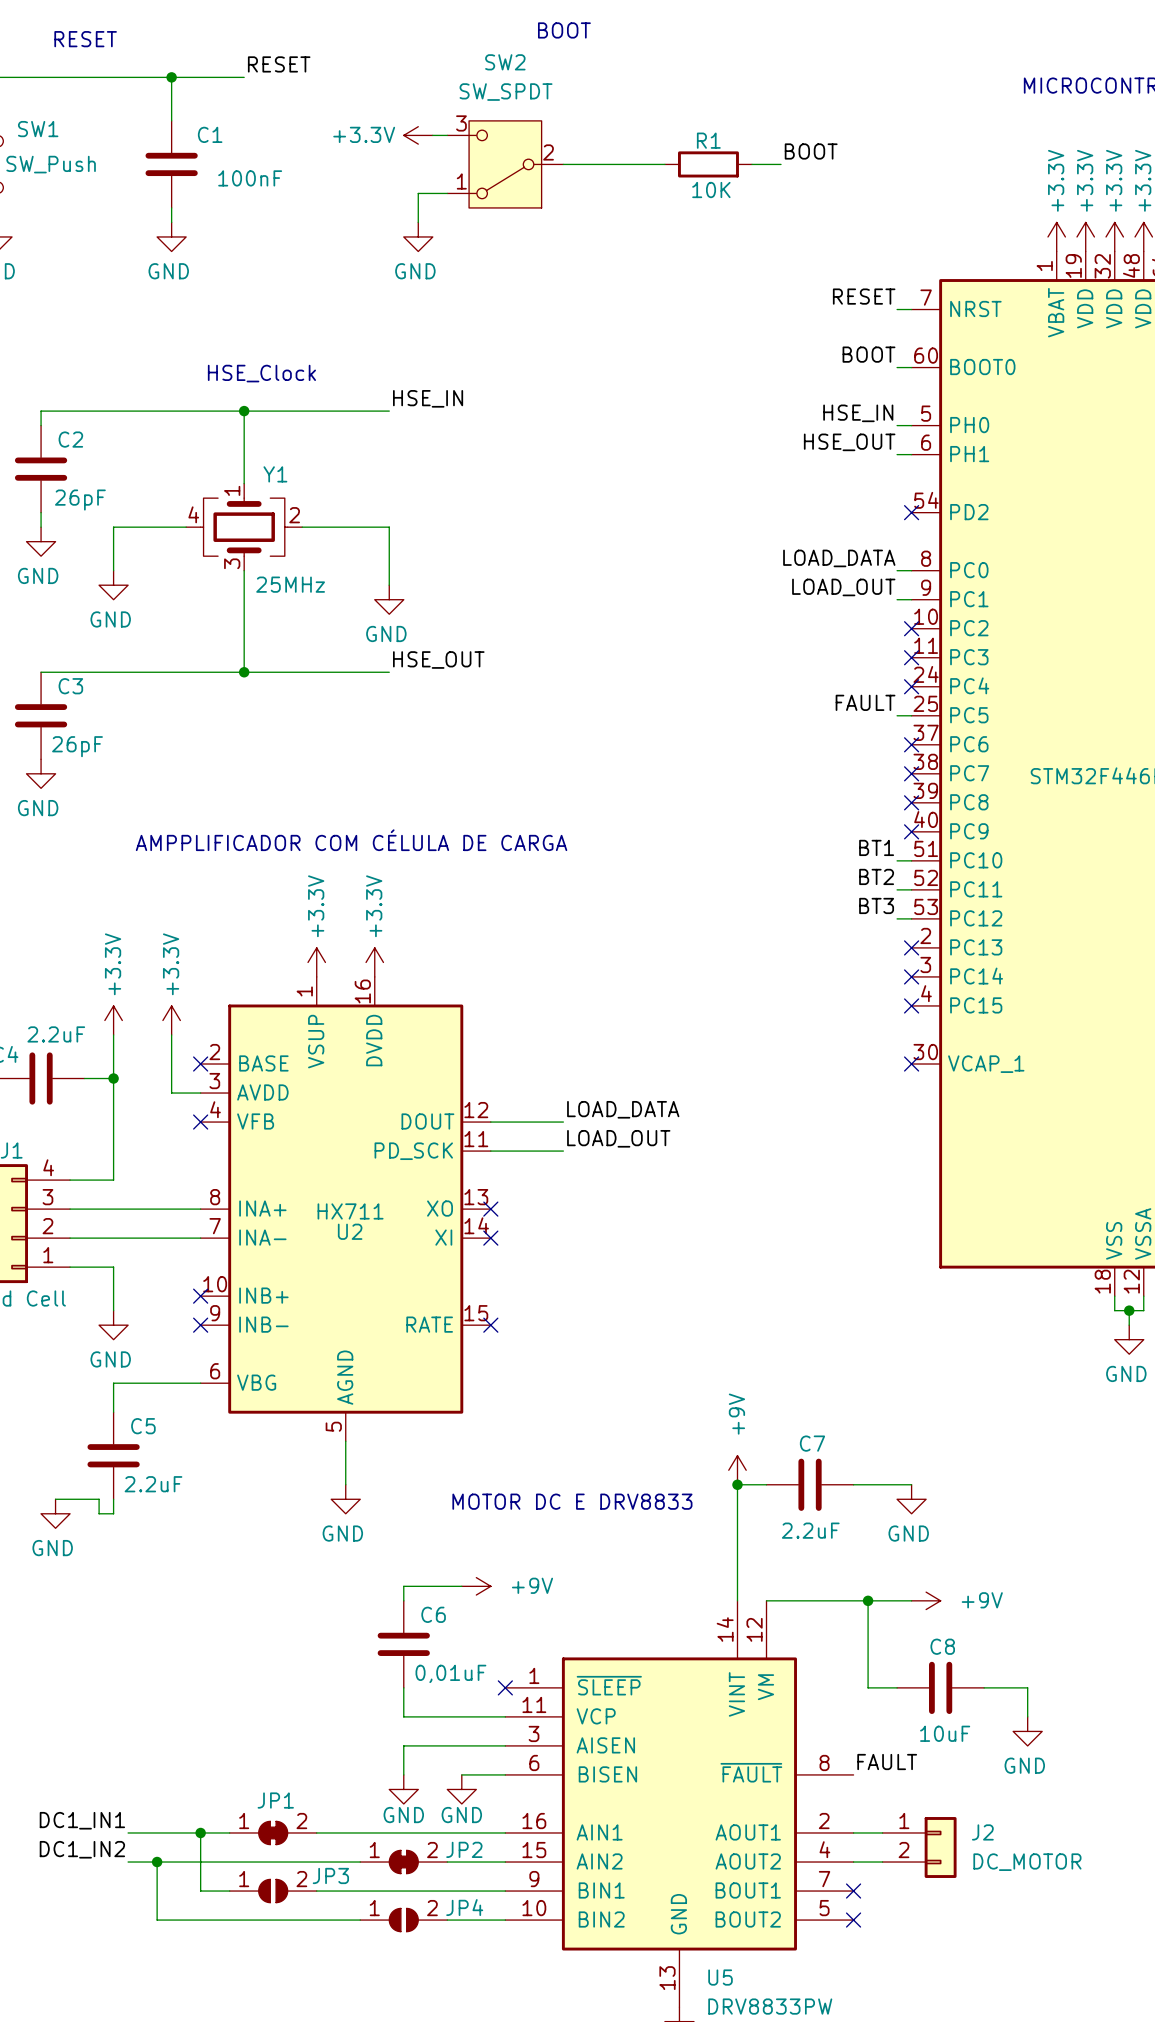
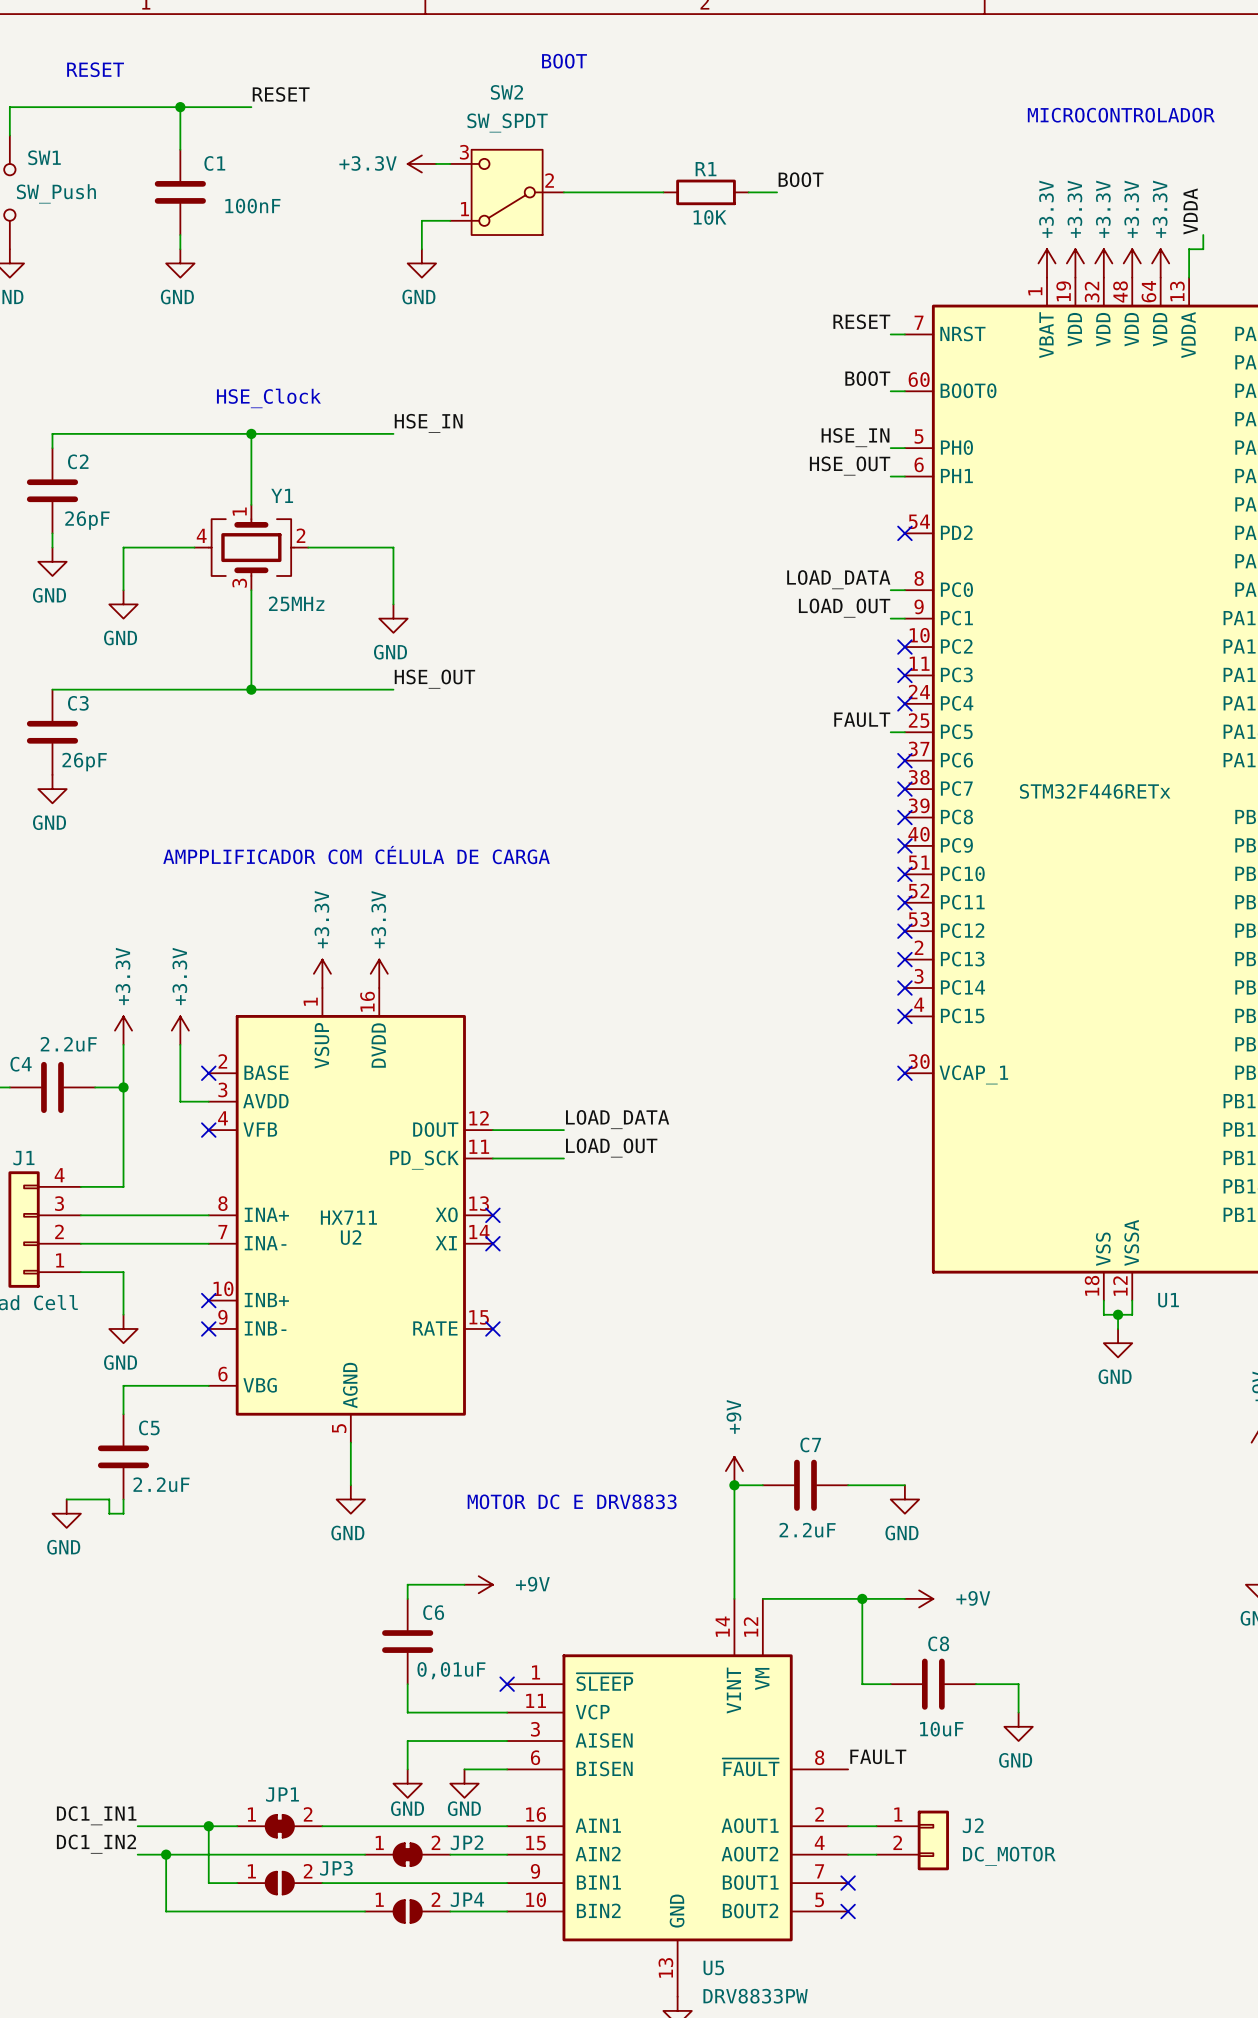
label: BT1 (876, 847) -> none
wire: (897, 860) (911, 860) -> none
no-connect mark: none -> (904, 874)
label: BT2 (876, 876) -> none
wire: (897, 889) (911, 889) -> none
no-connect mark: none -> (904, 902)
label: BT3 (876, 905) -> none
wire: (897, 918) (911, 918) -> none
no-connect mark: none -> (904, 931)

